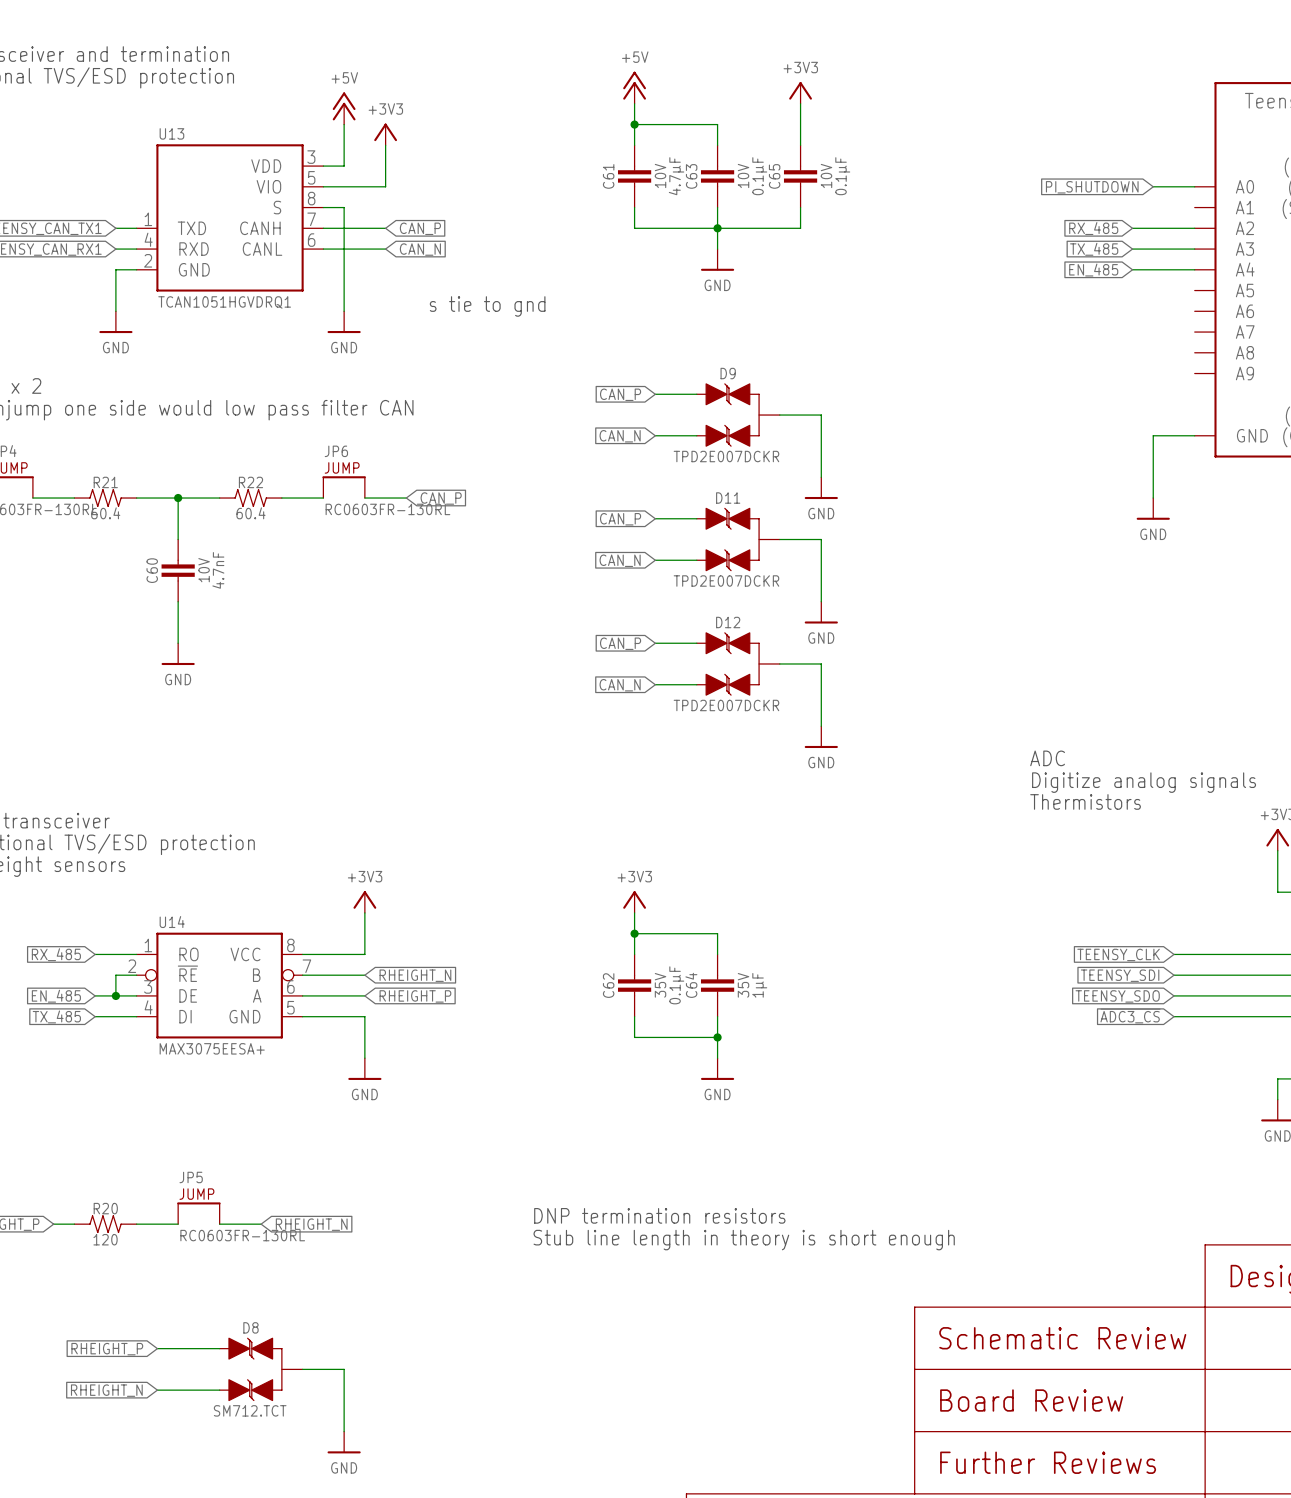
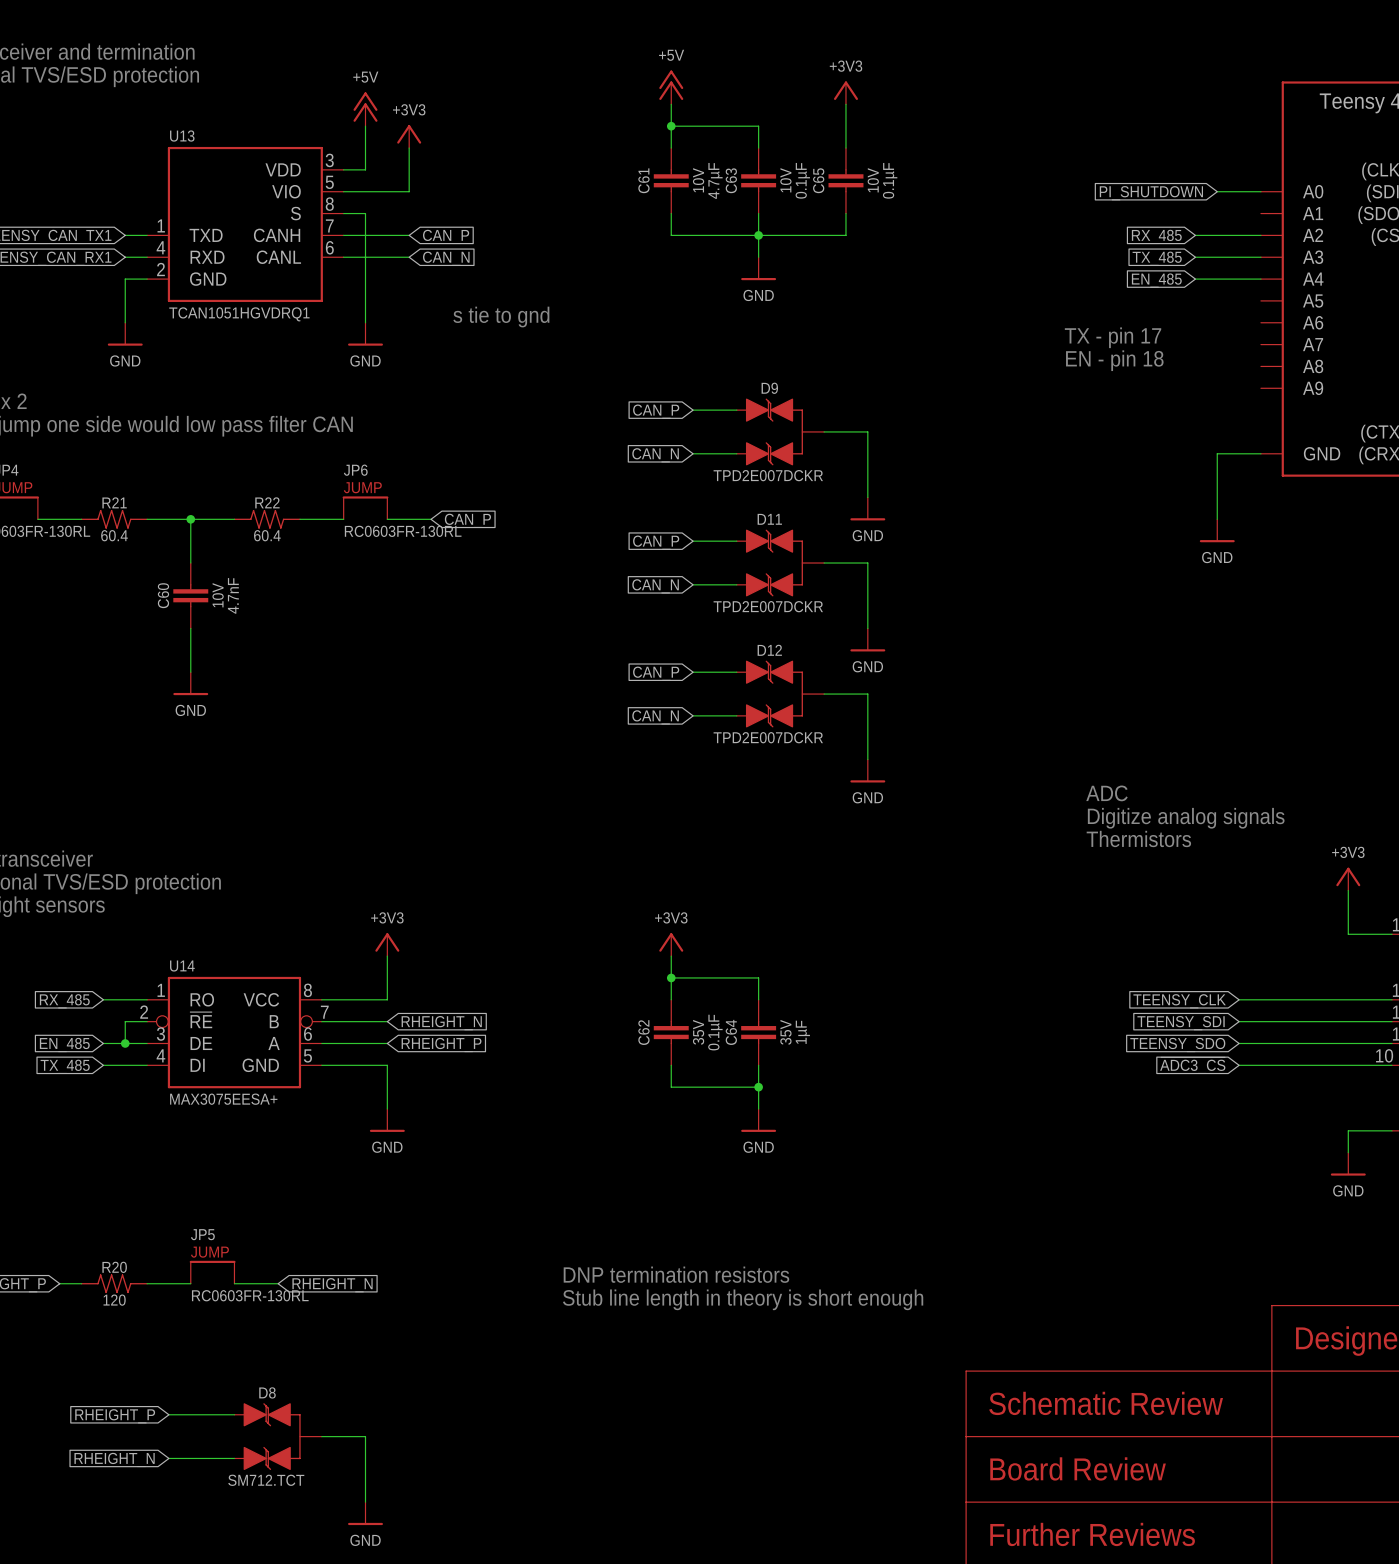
text: none -> TX - pin 17 (1113, 337)
text: none -> EN - pin 18 (1114, 360)

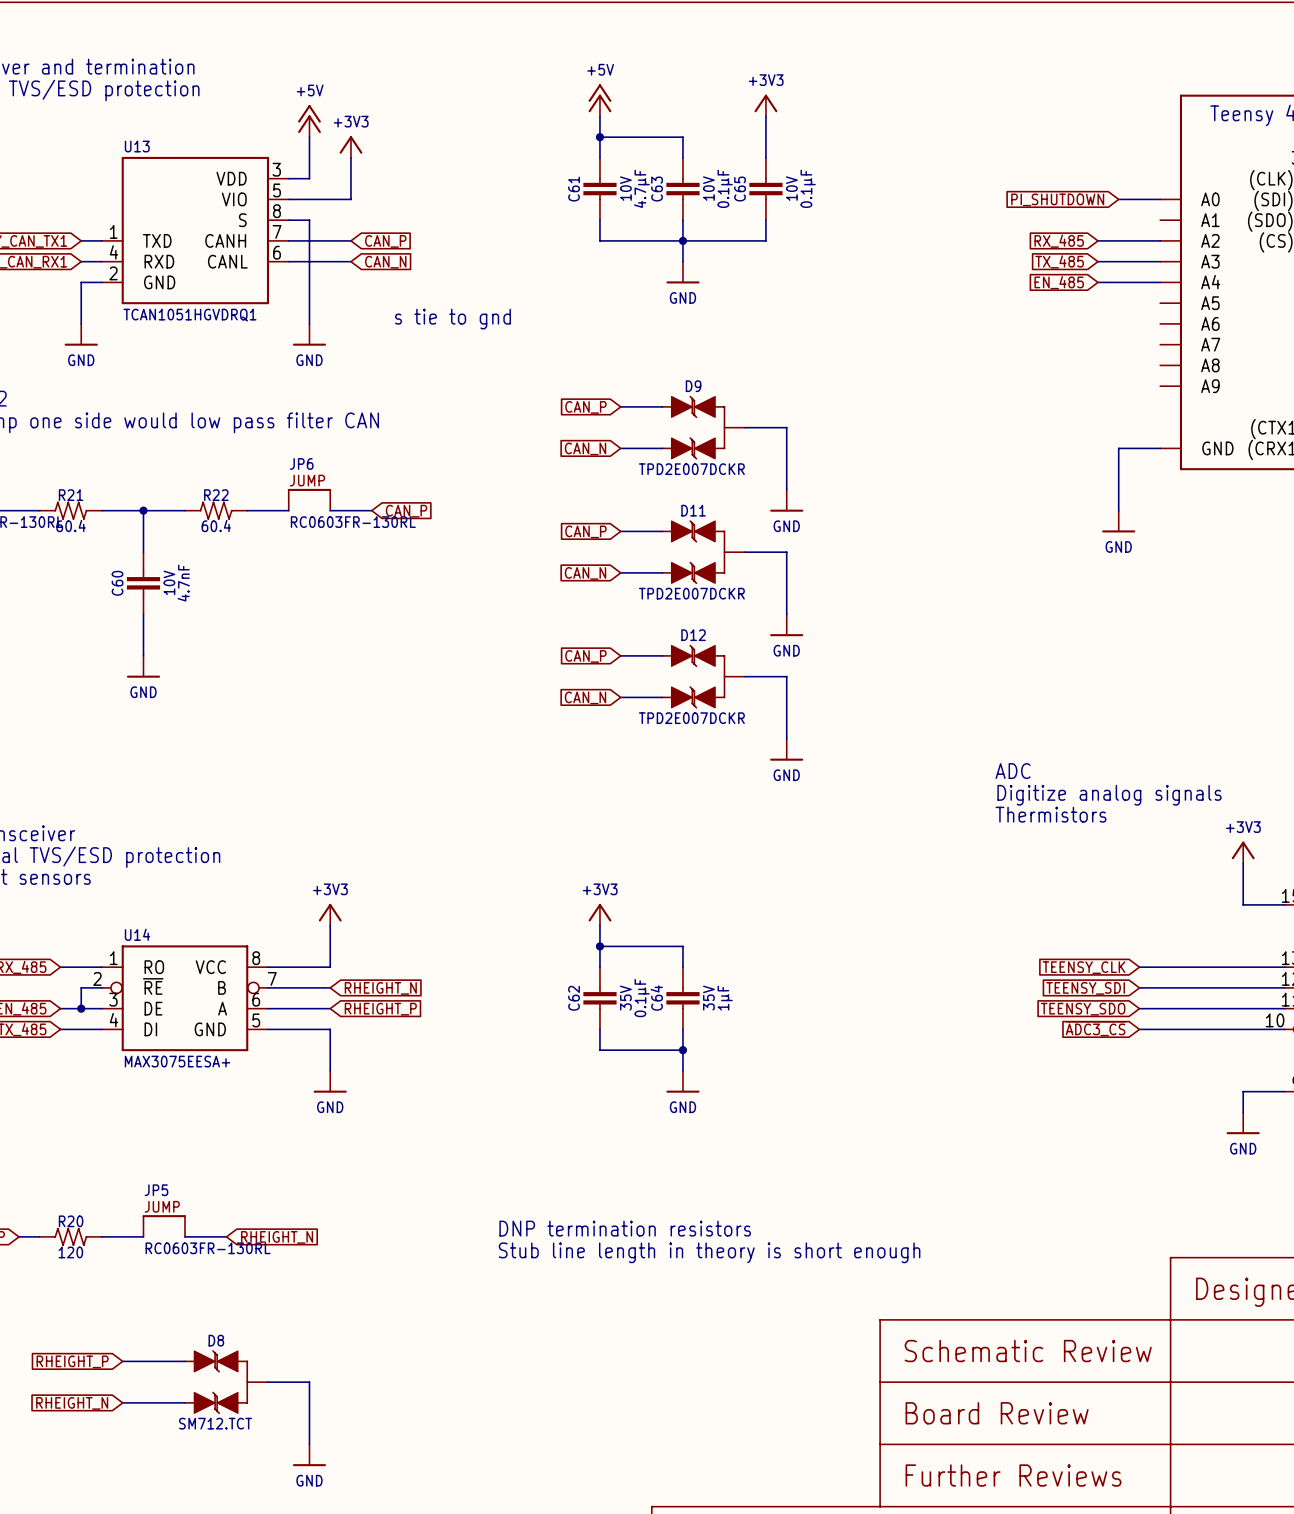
text: TX - pin 17 (1113, 337) -> none
text: EN - pin 18 (1114, 360) -> none

